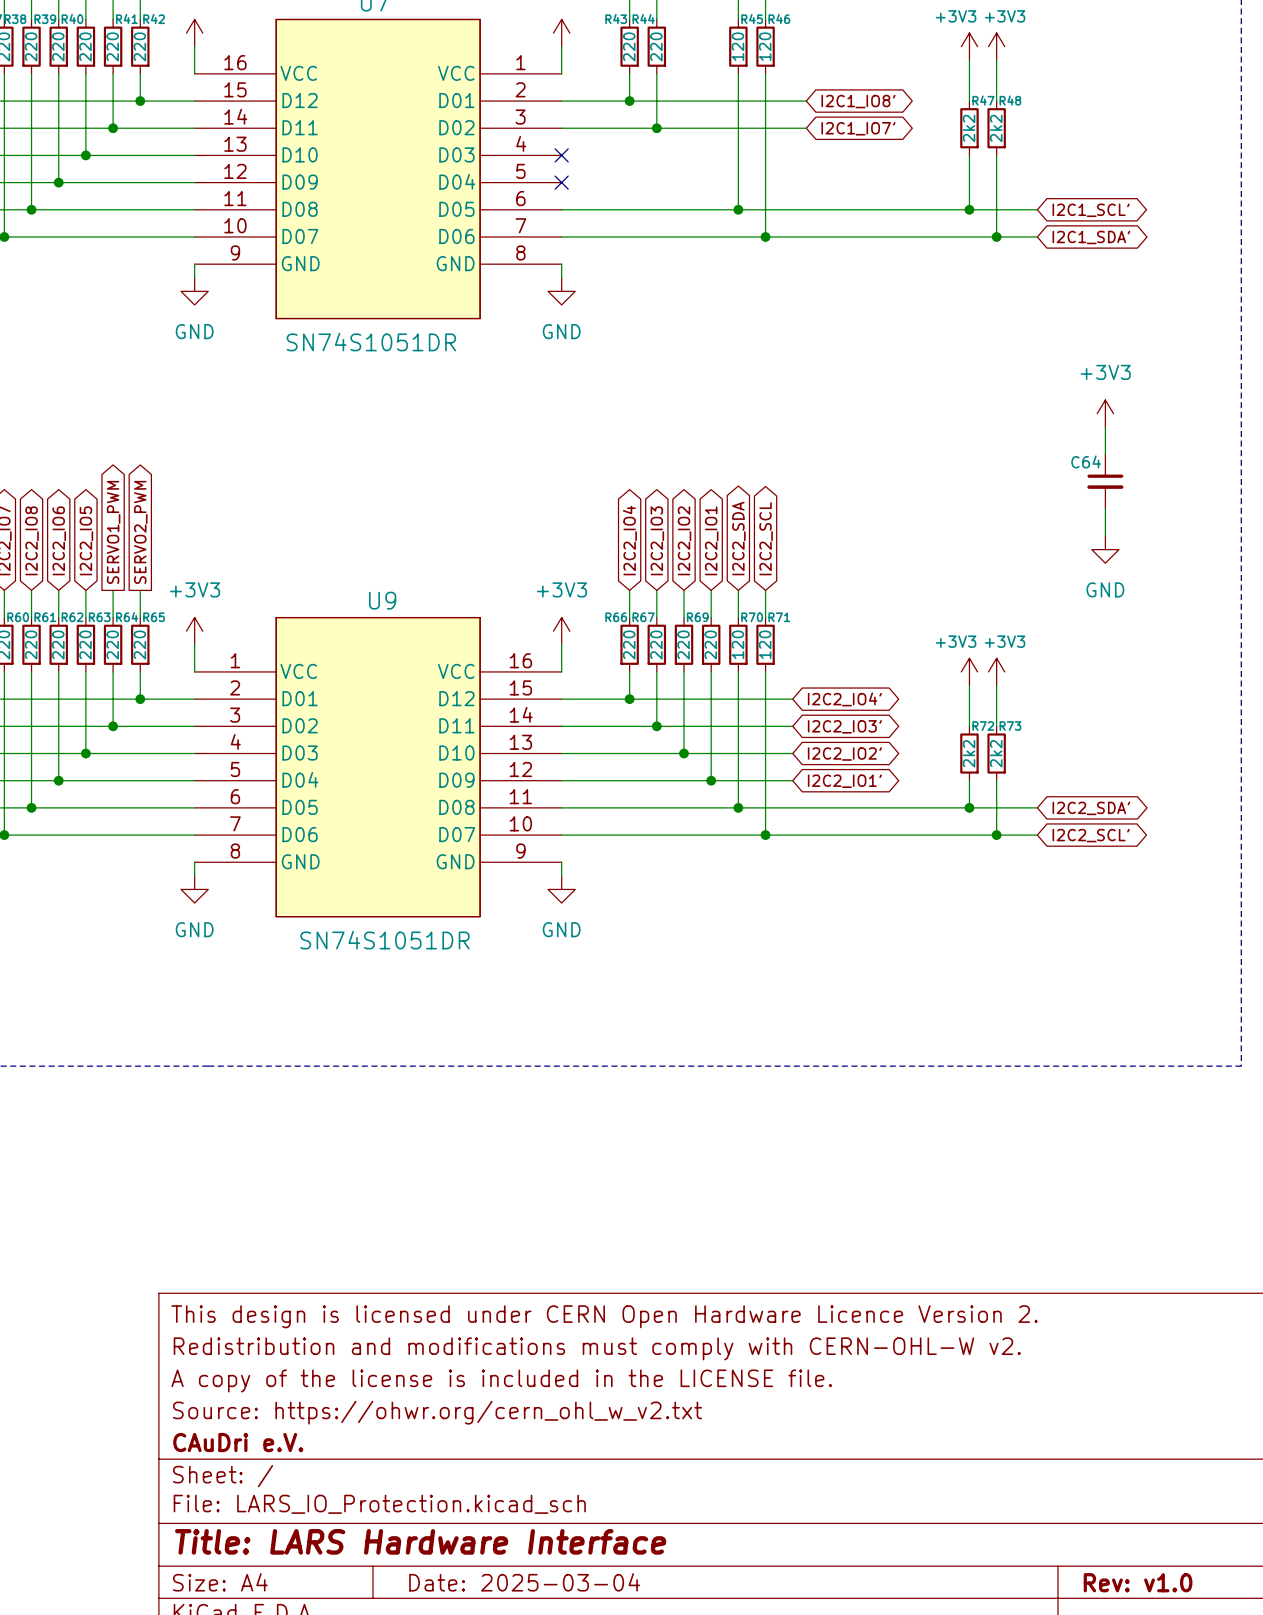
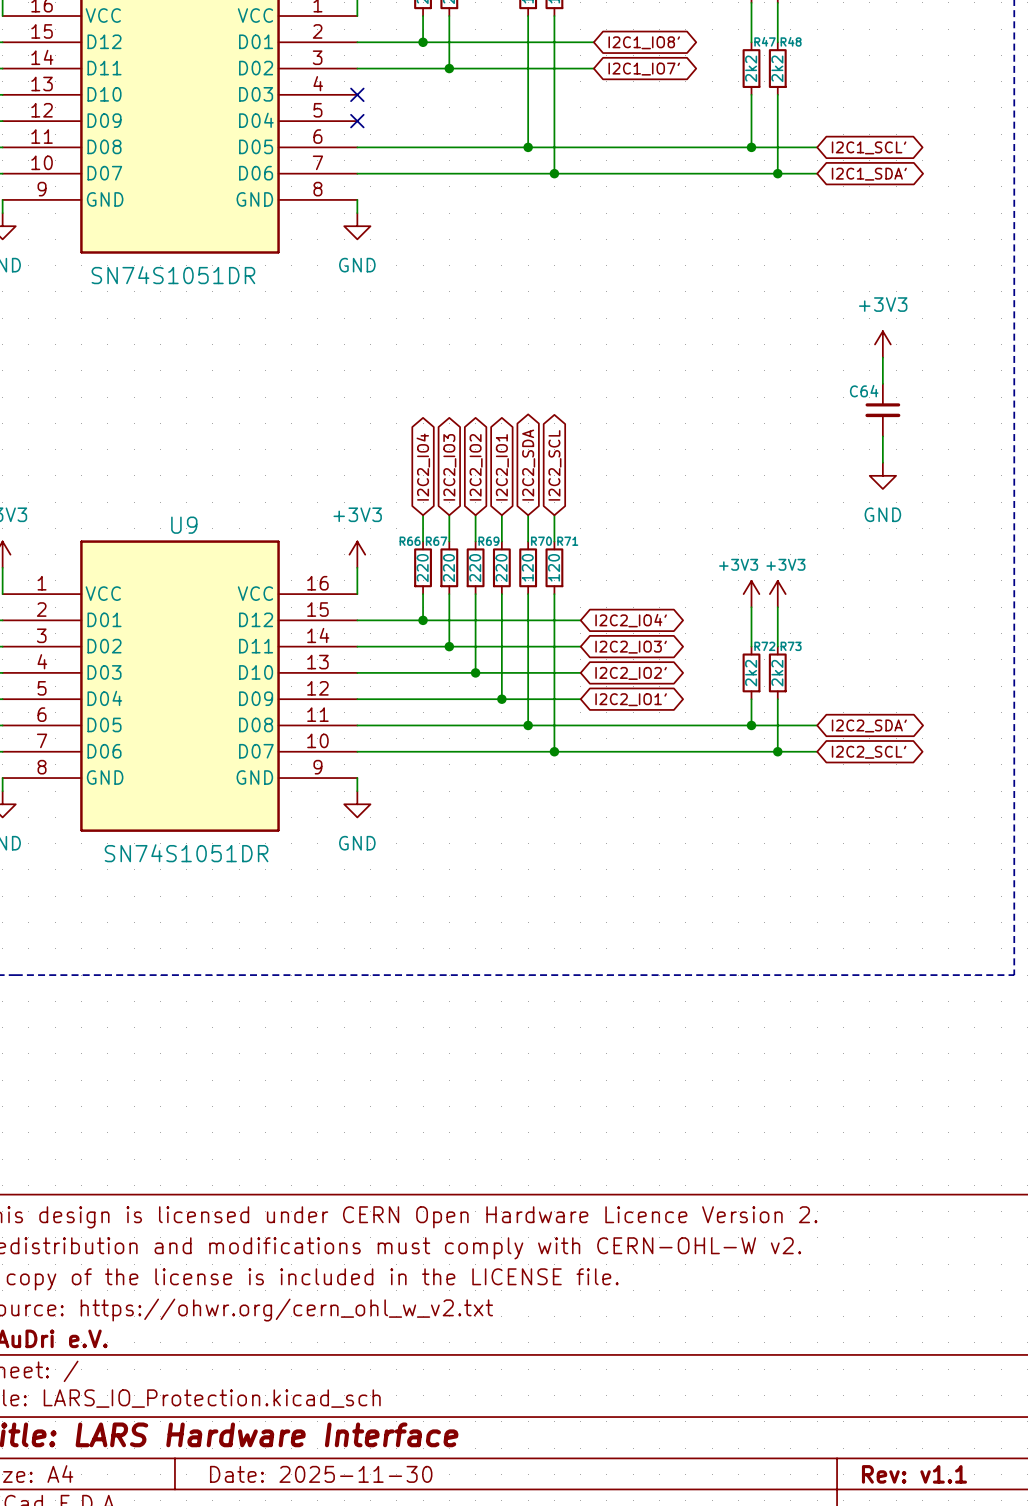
title block: Date: 2025-03-04 (524, 1582) -> Date: 2025-11-30 (321, 1474)
title block: Rev: v1.0 (1138, 1582) -> Rev: v1.1 (914, 1474)

